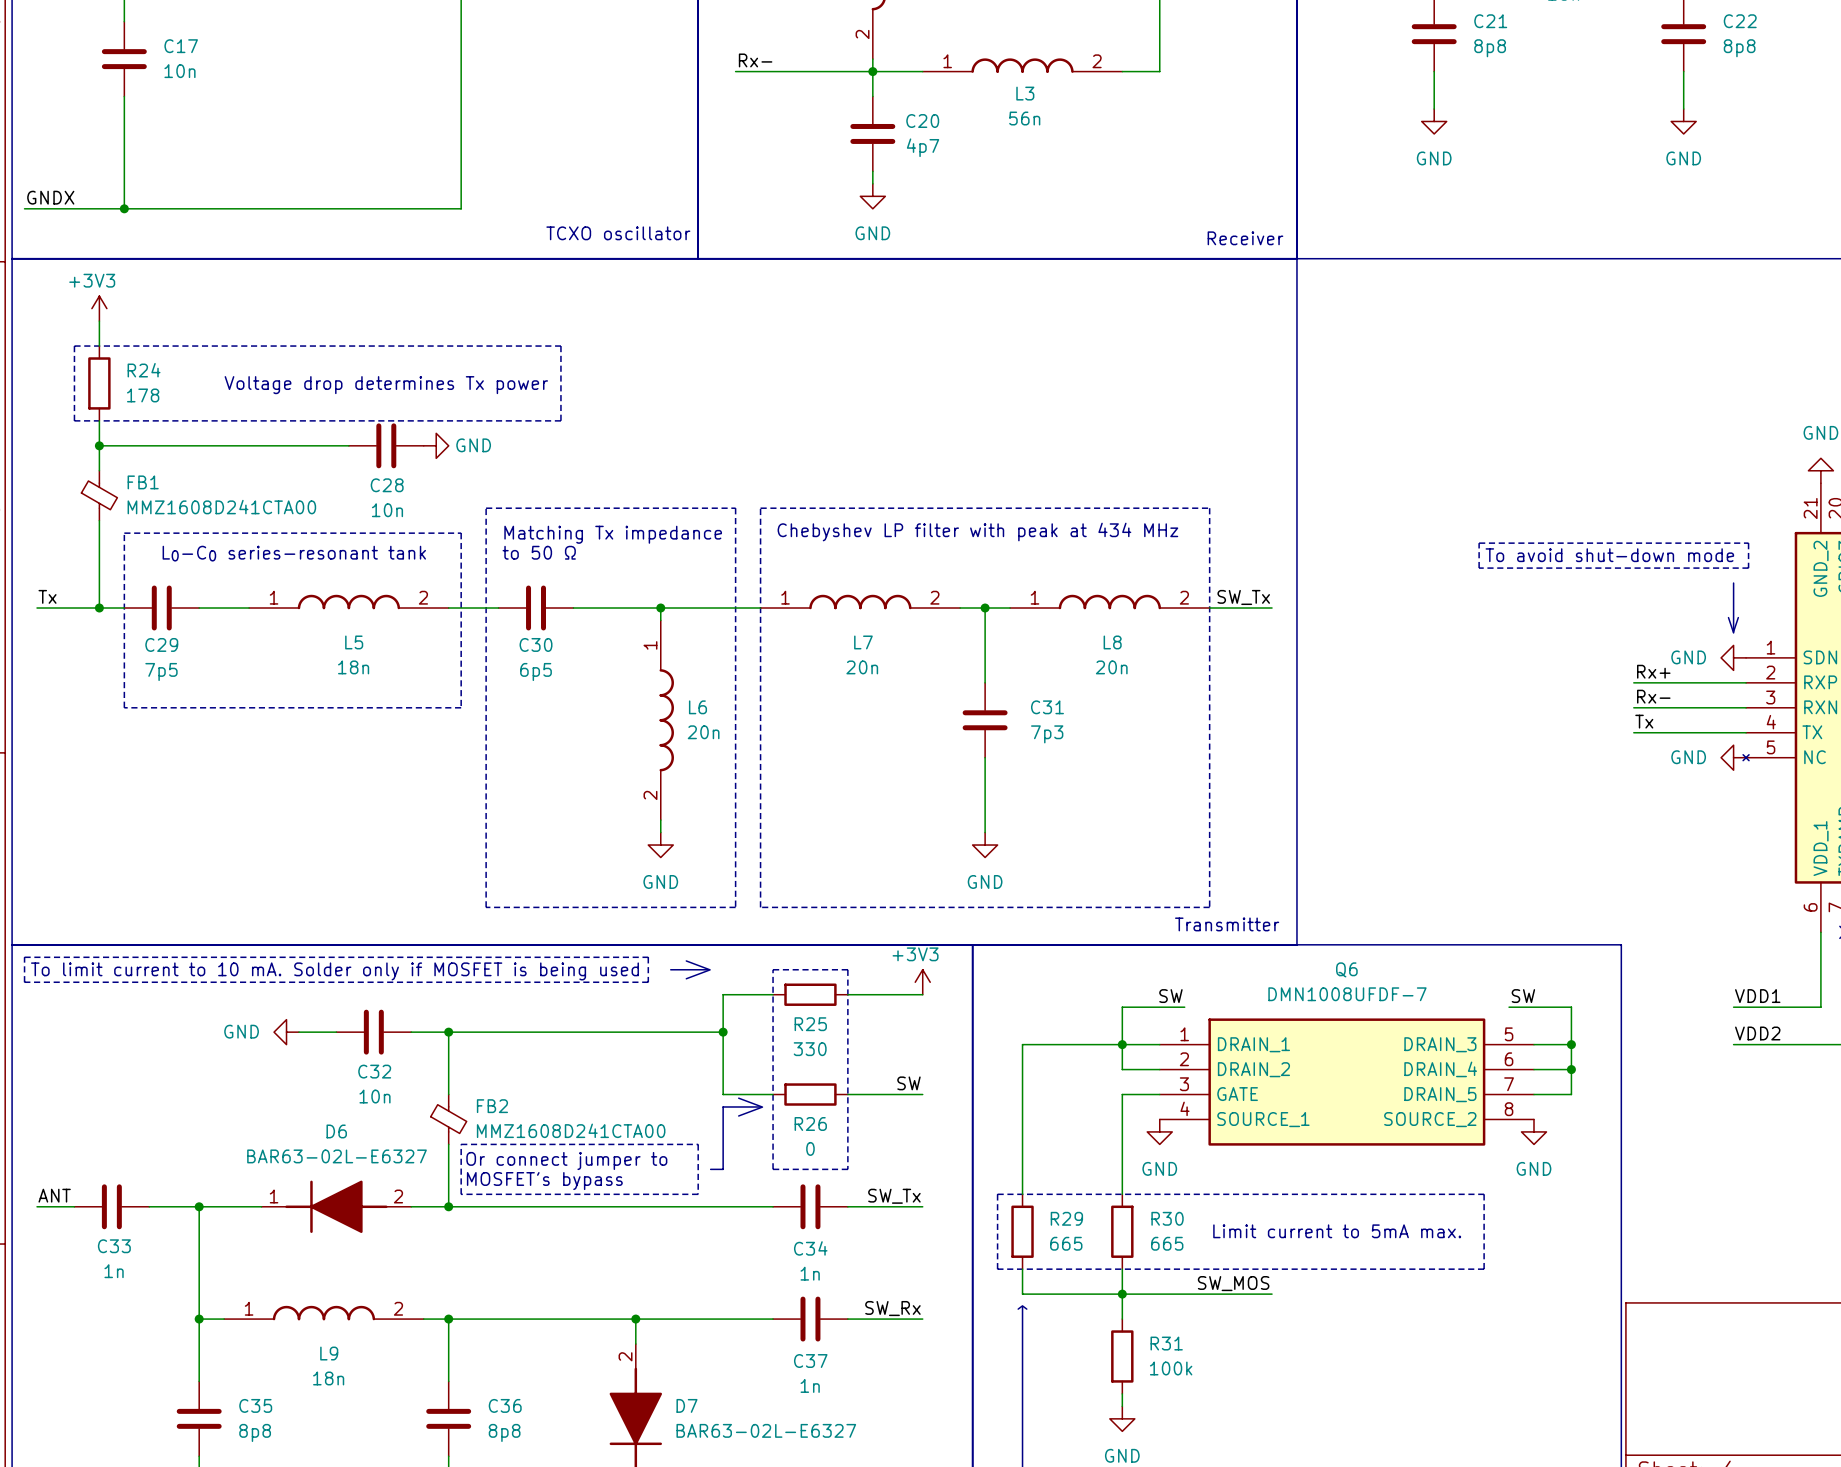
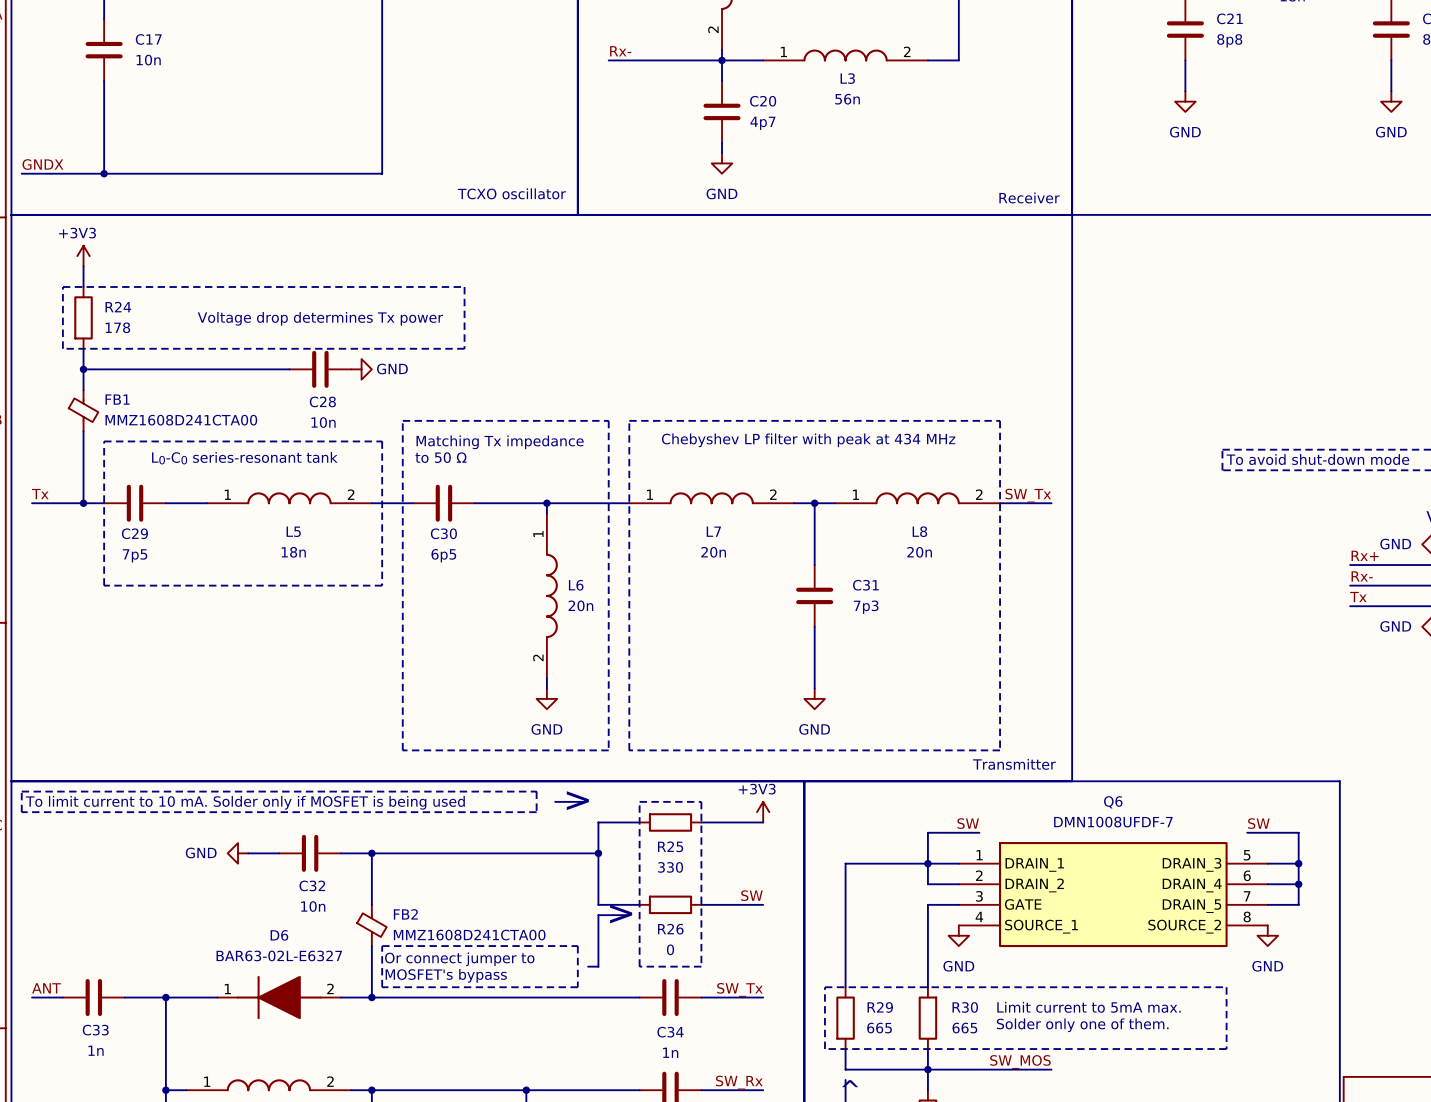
text position: Limit current to 5mA max. (1337, 1231) -> Limit current to 5mA max. (1089, 1007)
text: none -> Solder only one of them. (1082, 1025)

